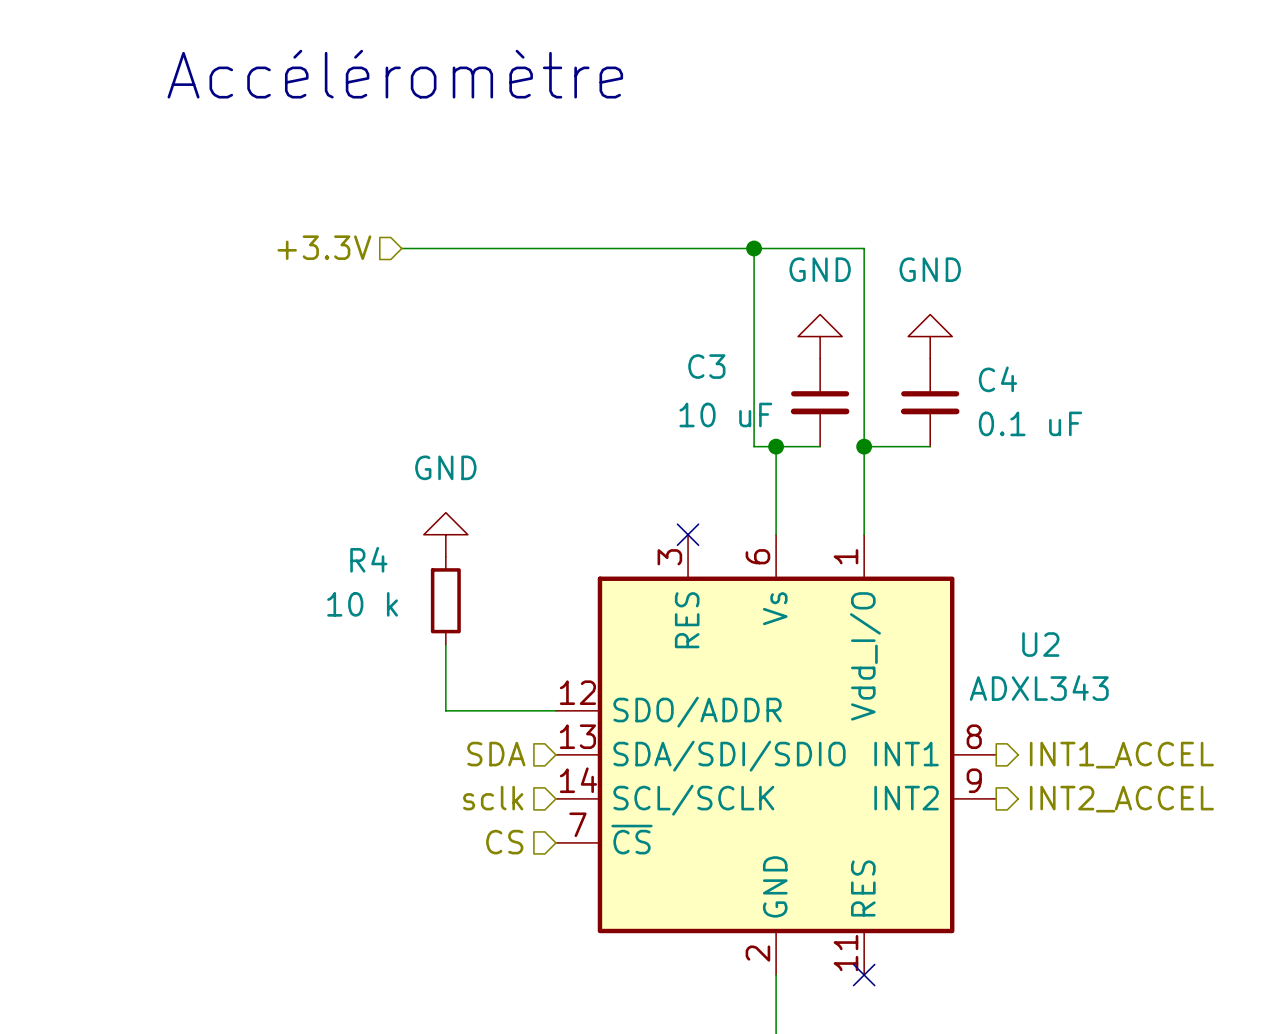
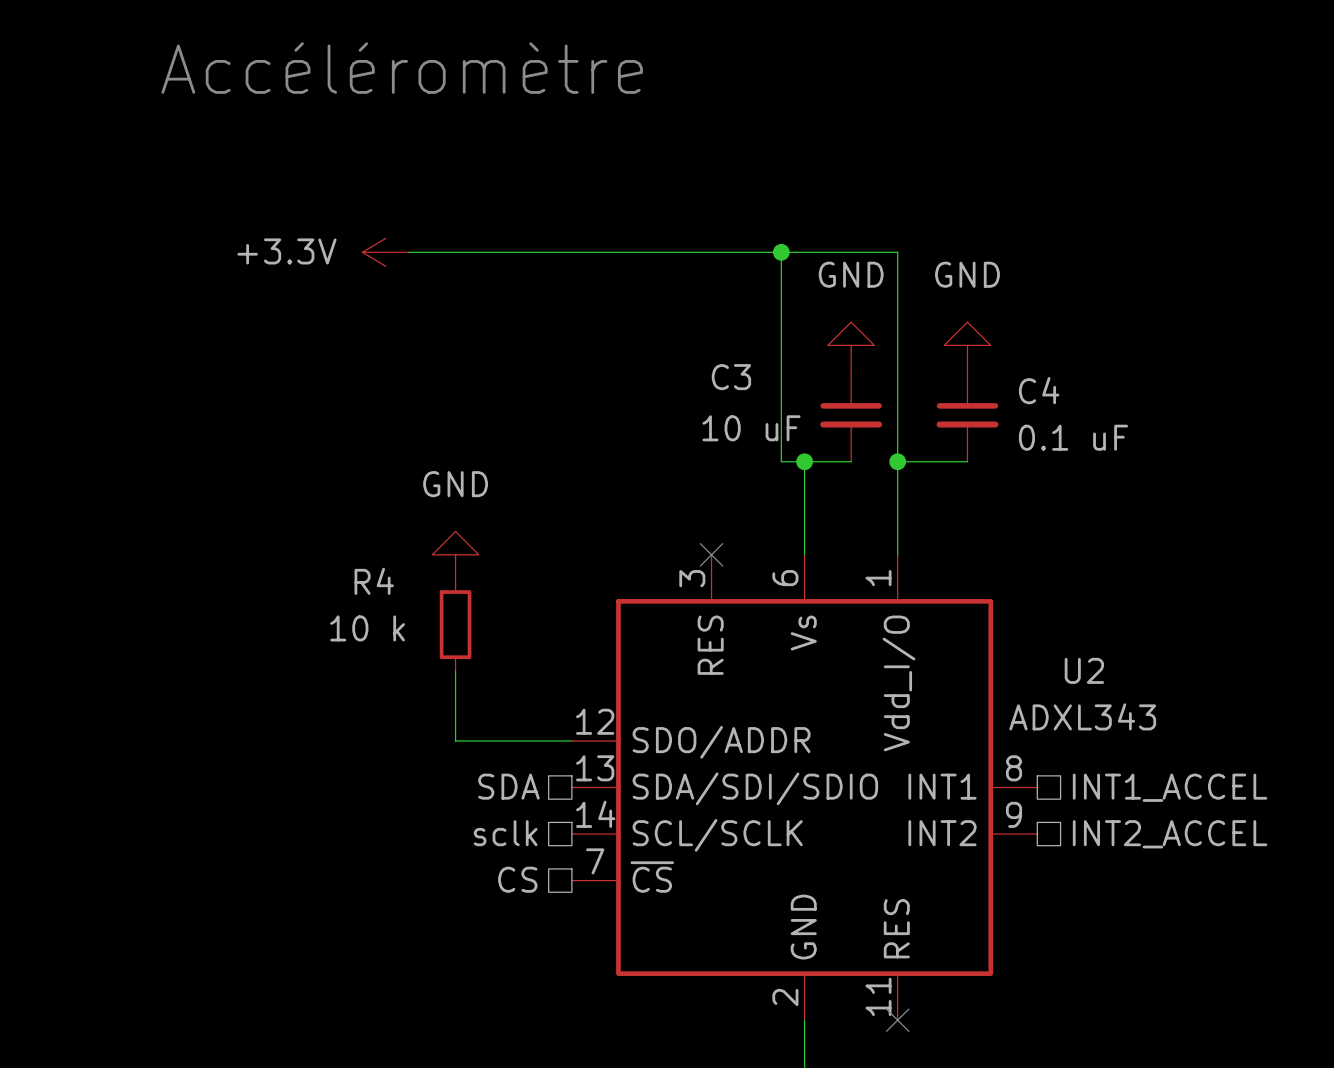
hierarchical label: +3.3V (324, 247) -> none
power symbol: none -> +3.3V (385, 252)
hierarchical label shape: input (496, 754) -> passive (508, 786)
hierarchical label shape: output (1121, 755) -> passive (1170, 787)
hierarchical label shape: input (493, 798) -> passive (505, 833)
hierarchical label shape: output (1121, 799) -> passive (1170, 834)
hierarchical label shape: input (504, 842) -> passive (517, 879)

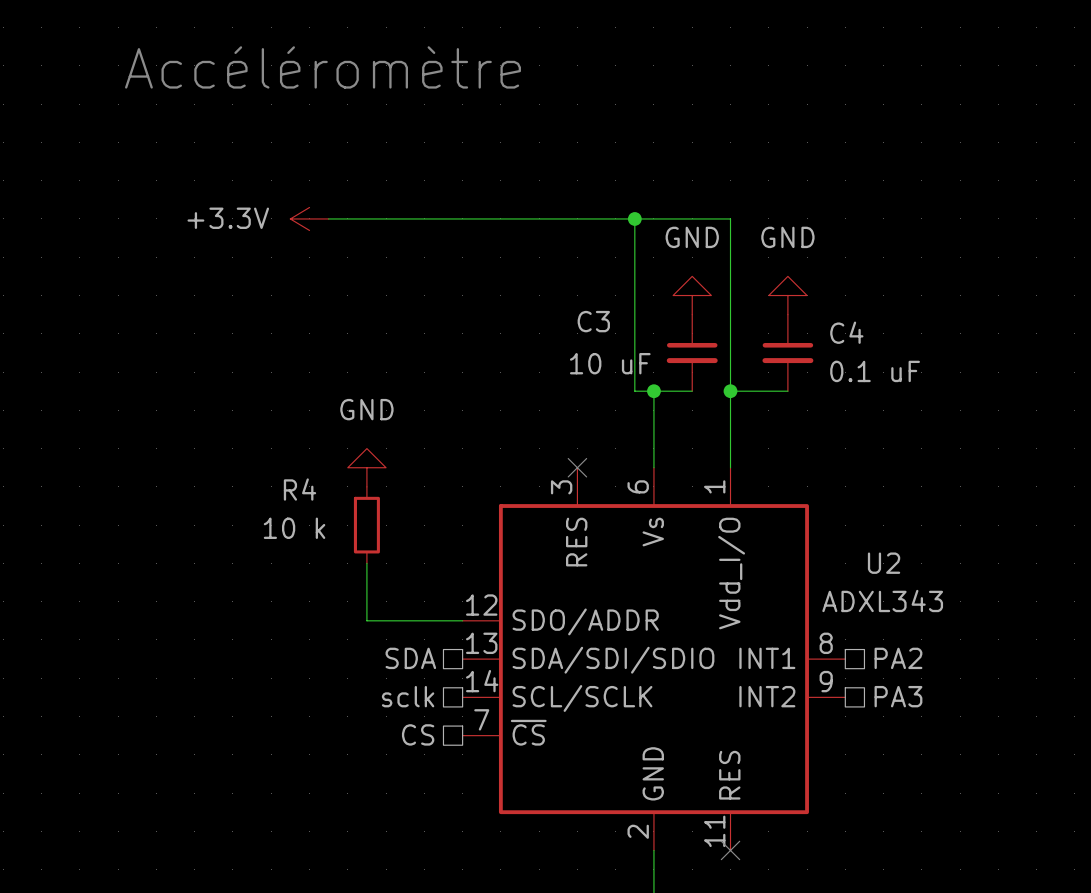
hierarchical label: INT1_ACCEL (1170, 787) -> PA2 (898, 658)
hierarchical label: INT2_ACCEL (1170, 834) -> PA3 (898, 696)

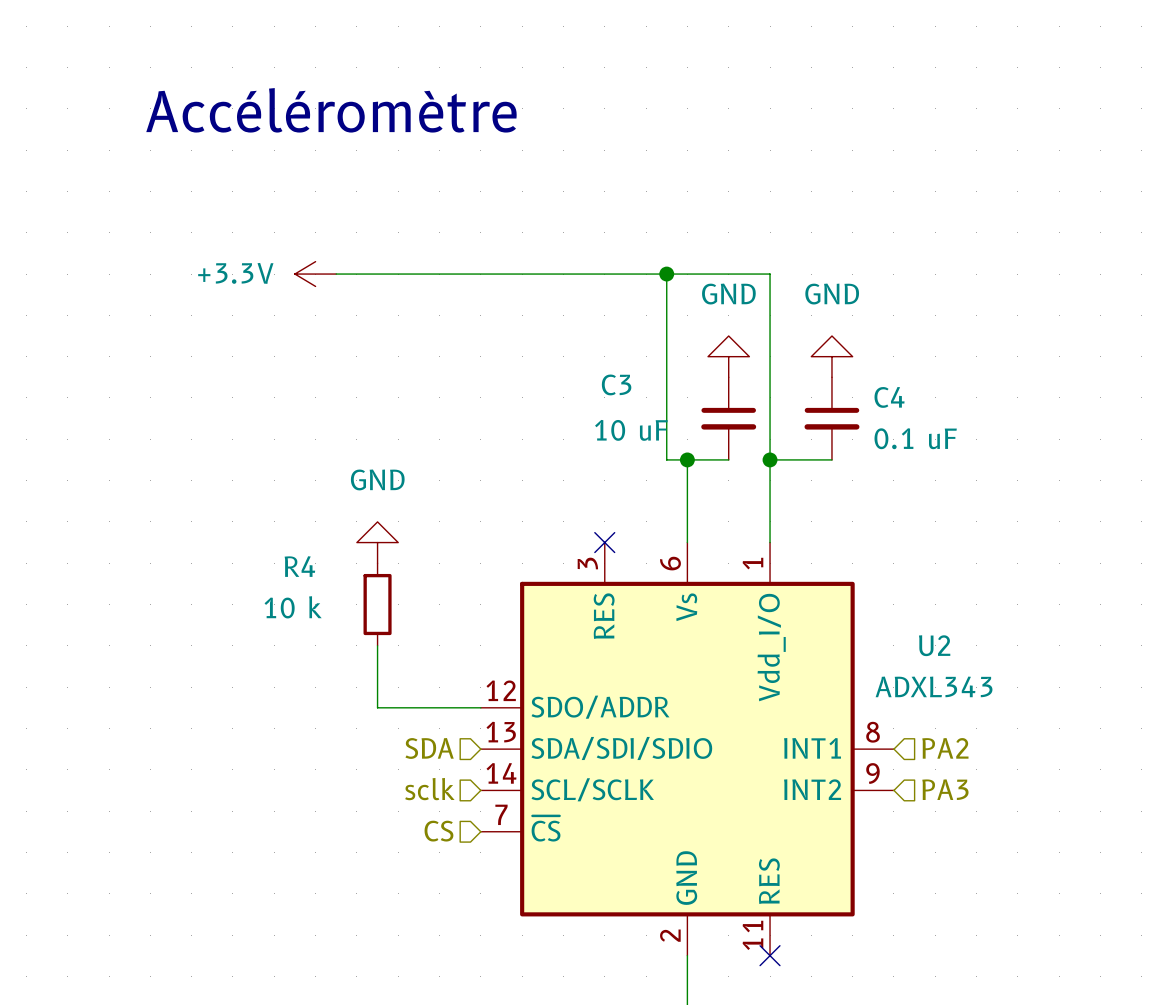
hierarchical label shape: passive (410, 658) -> input (429, 748)
hierarchical label shape: passive (898, 658) -> input (945, 748)
hierarchical label shape: passive (408, 696) -> input (429, 789)
hierarchical label shape: passive (898, 696) -> input (945, 789)
hierarchical label shape: passive (418, 734) -> input (438, 831)

